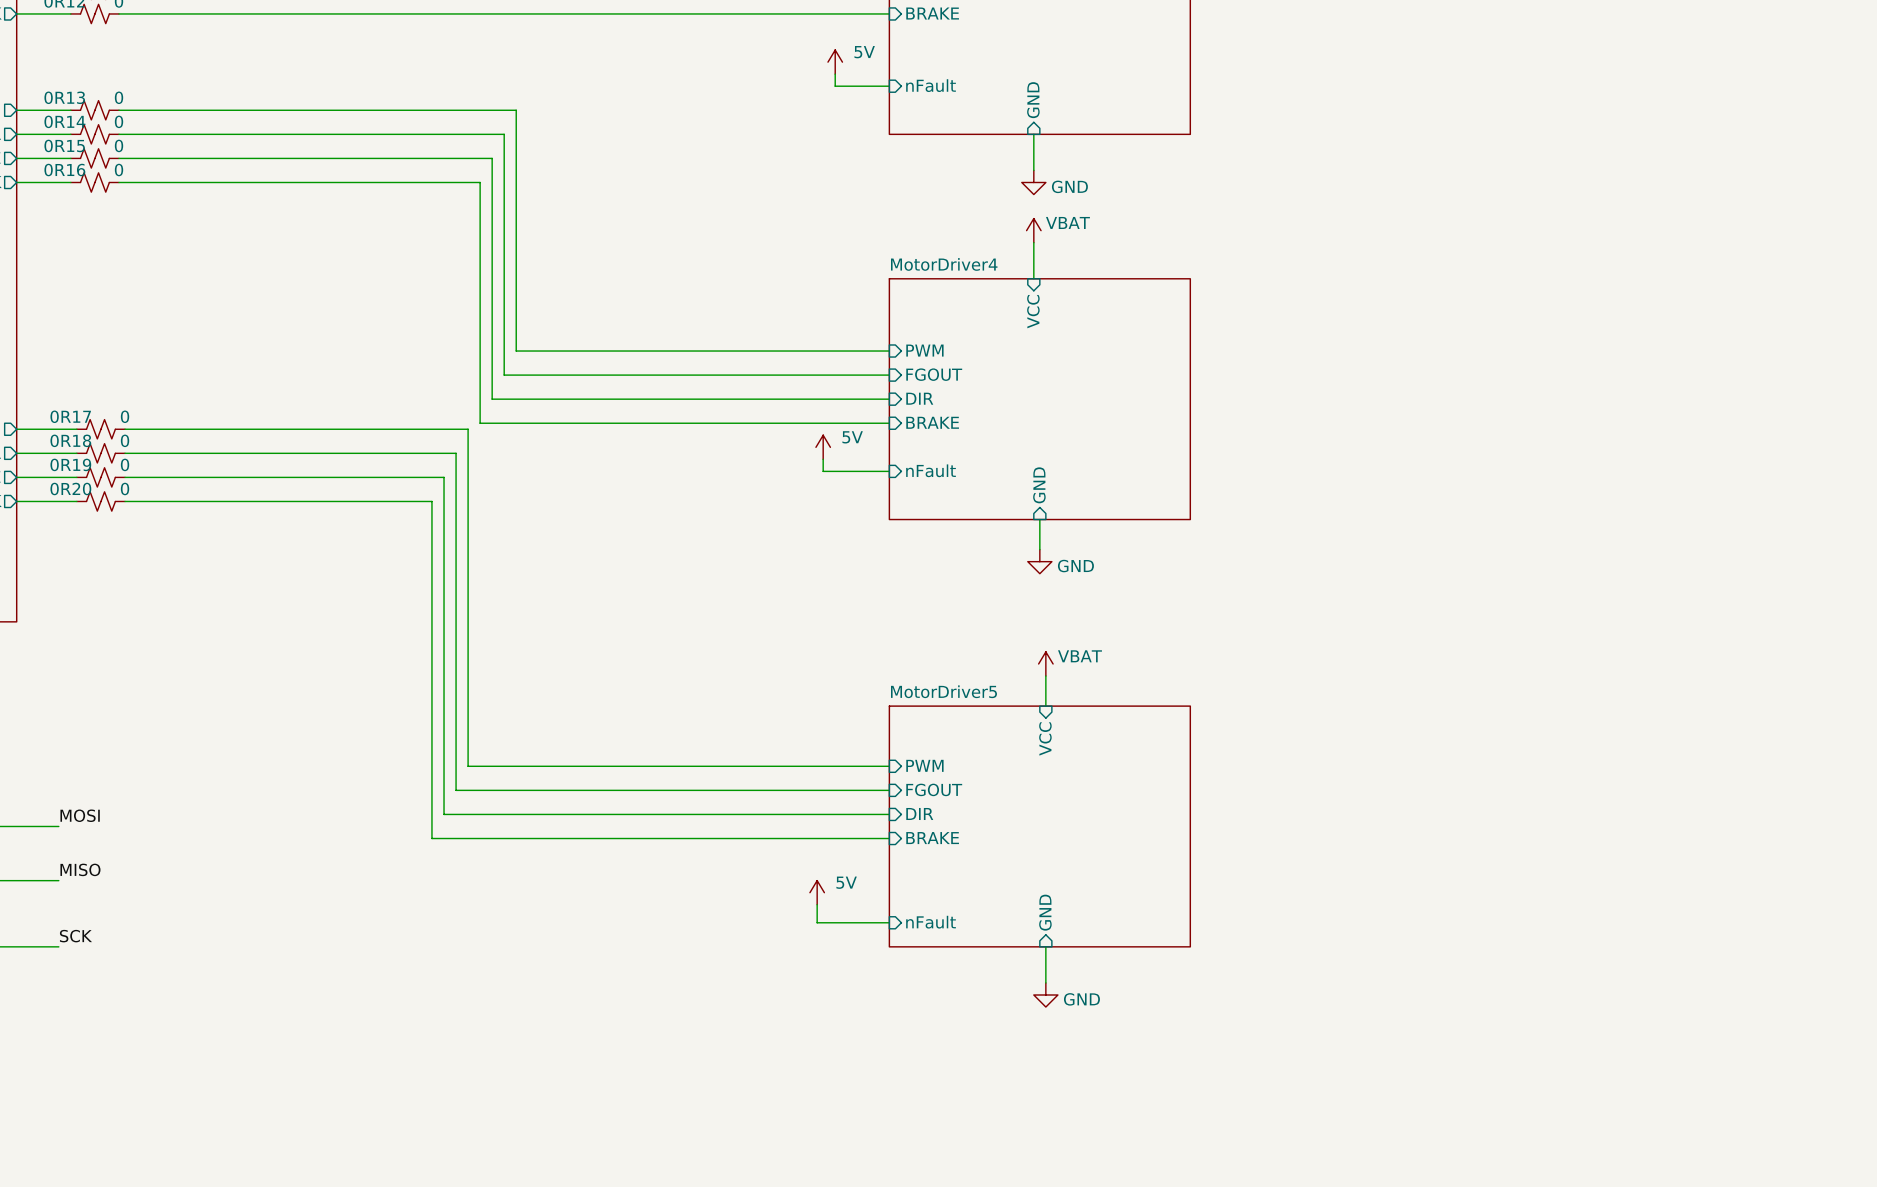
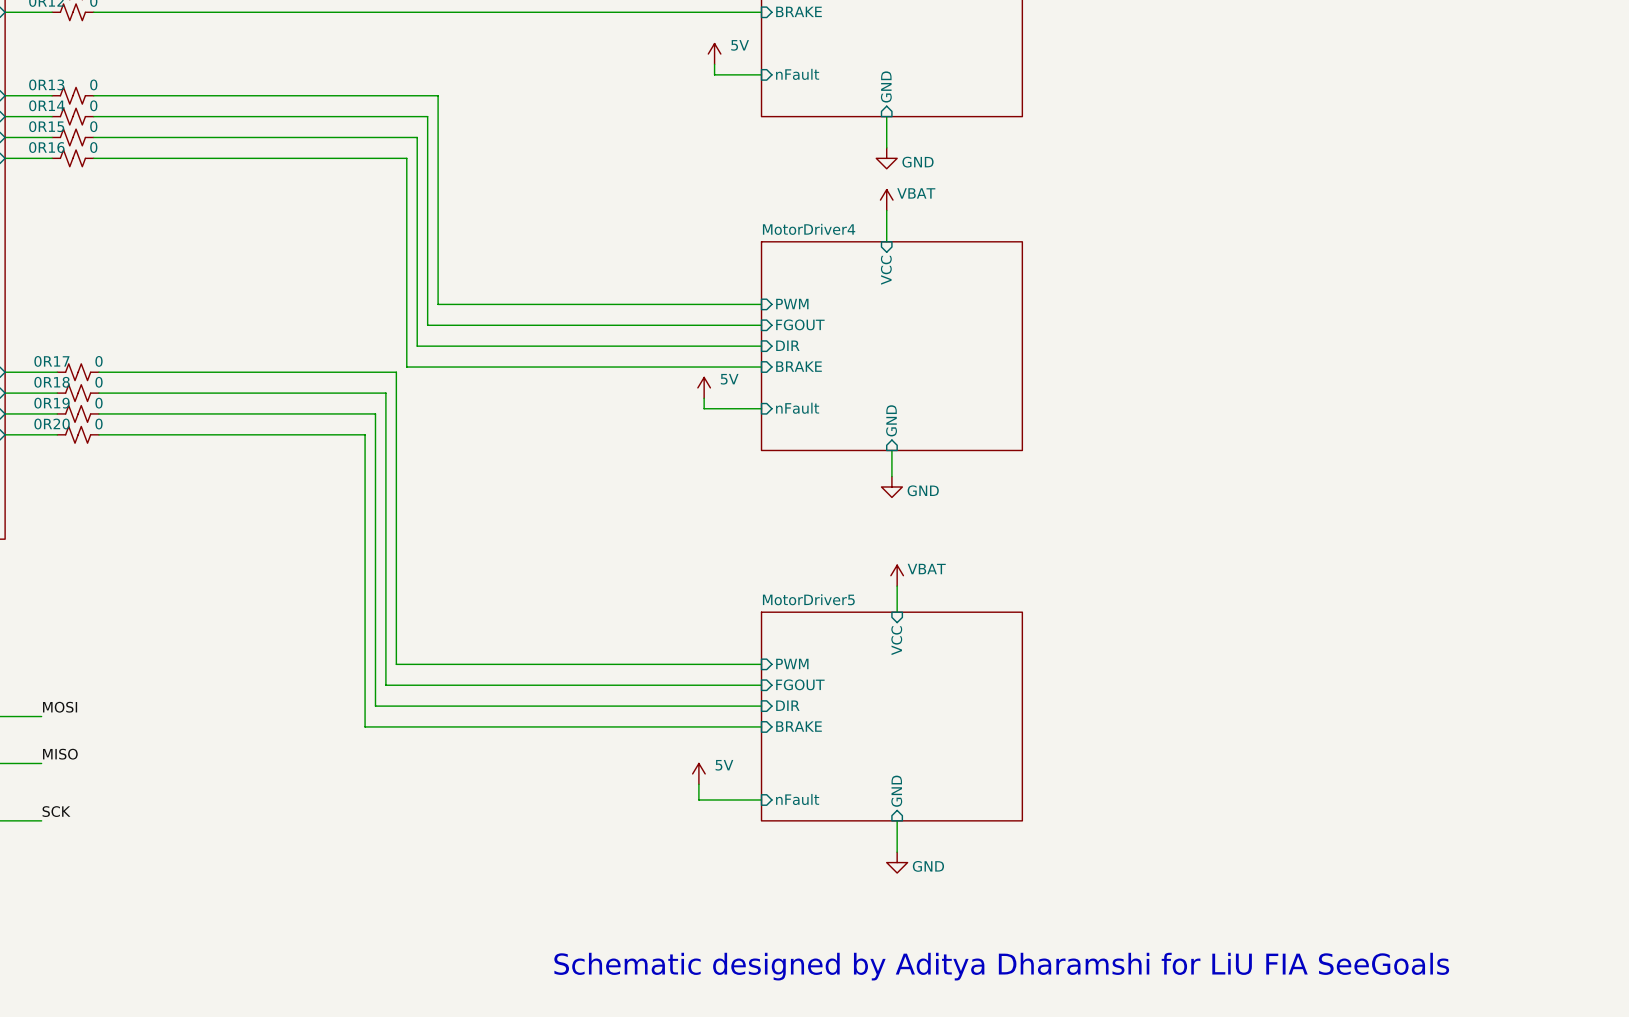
text: none -> Schematic designed by Aditya Dharamshi for LiU FIA SeeGoals (1001, 966)

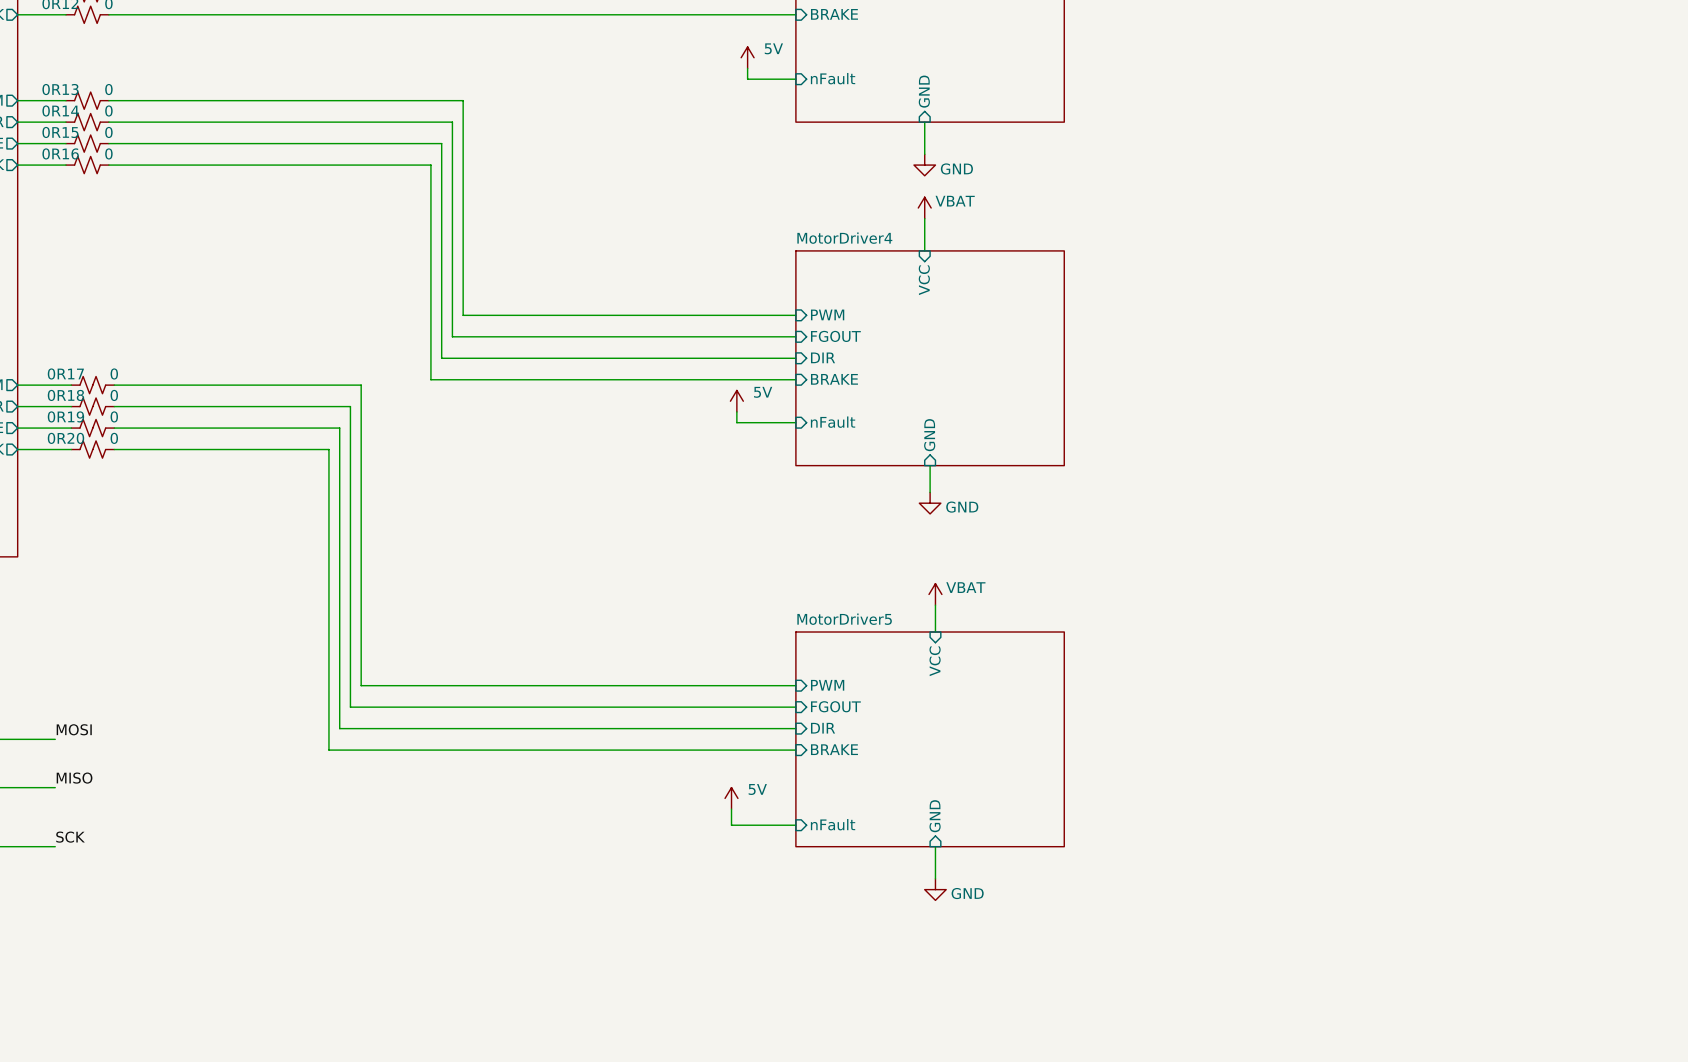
wire: (338, 372) (396, 372) (396, 664) -> (361, 385) (361, 685) (420, 685)
wire: (328, 393) (385, 393) (385, 685) -> (350, 406) (350, 707) (409, 707)
wire: (318, 413) (375, 413) (375, 706) -> (339, 428) (339, 728) (398, 728)
wire: (307, 434) (365, 434) (365, 726) -> (328, 449) (328, 750) (388, 750)
text: Schematic designed by Aditya Dharamshi for LiU FIA SeeGoals (1001, 966) -> none

